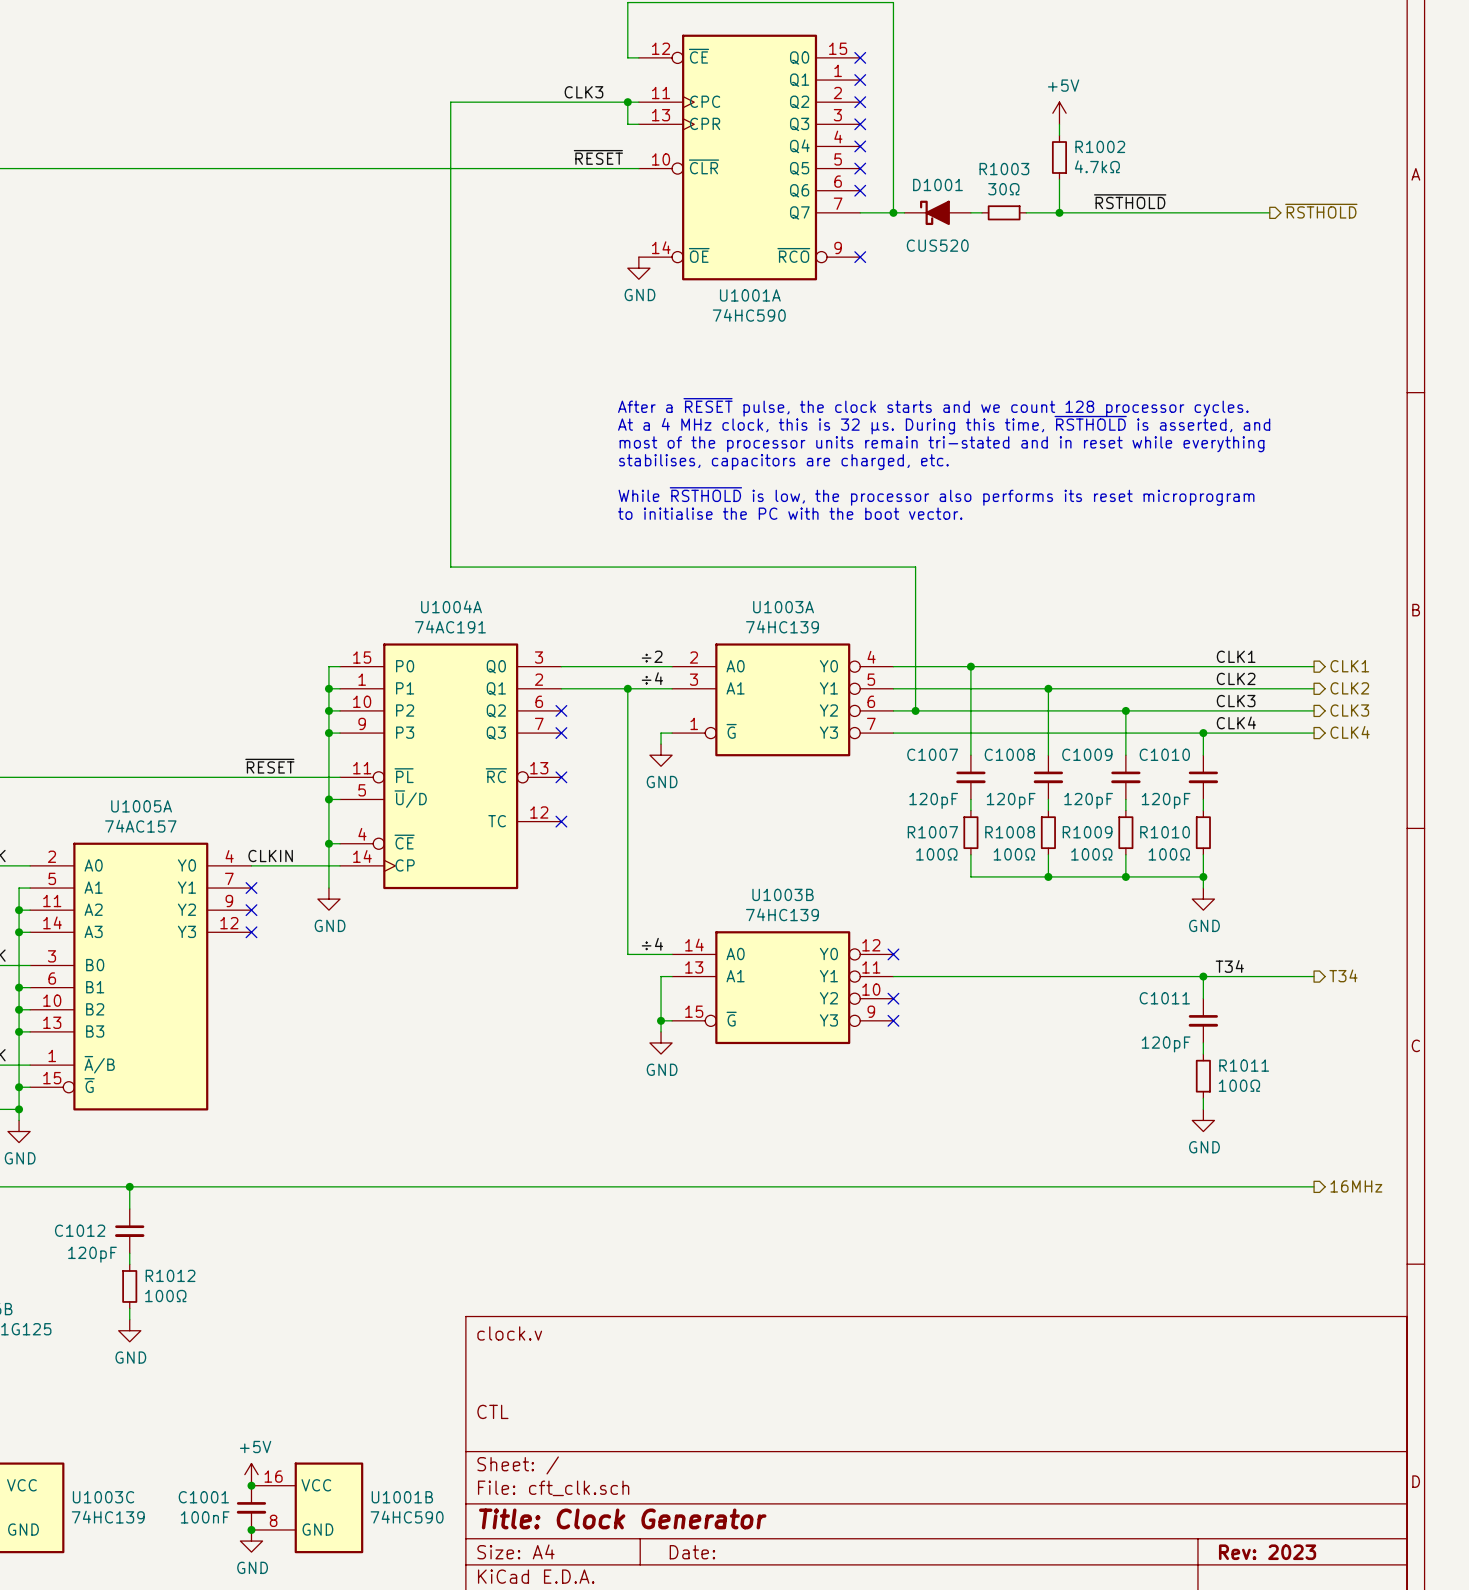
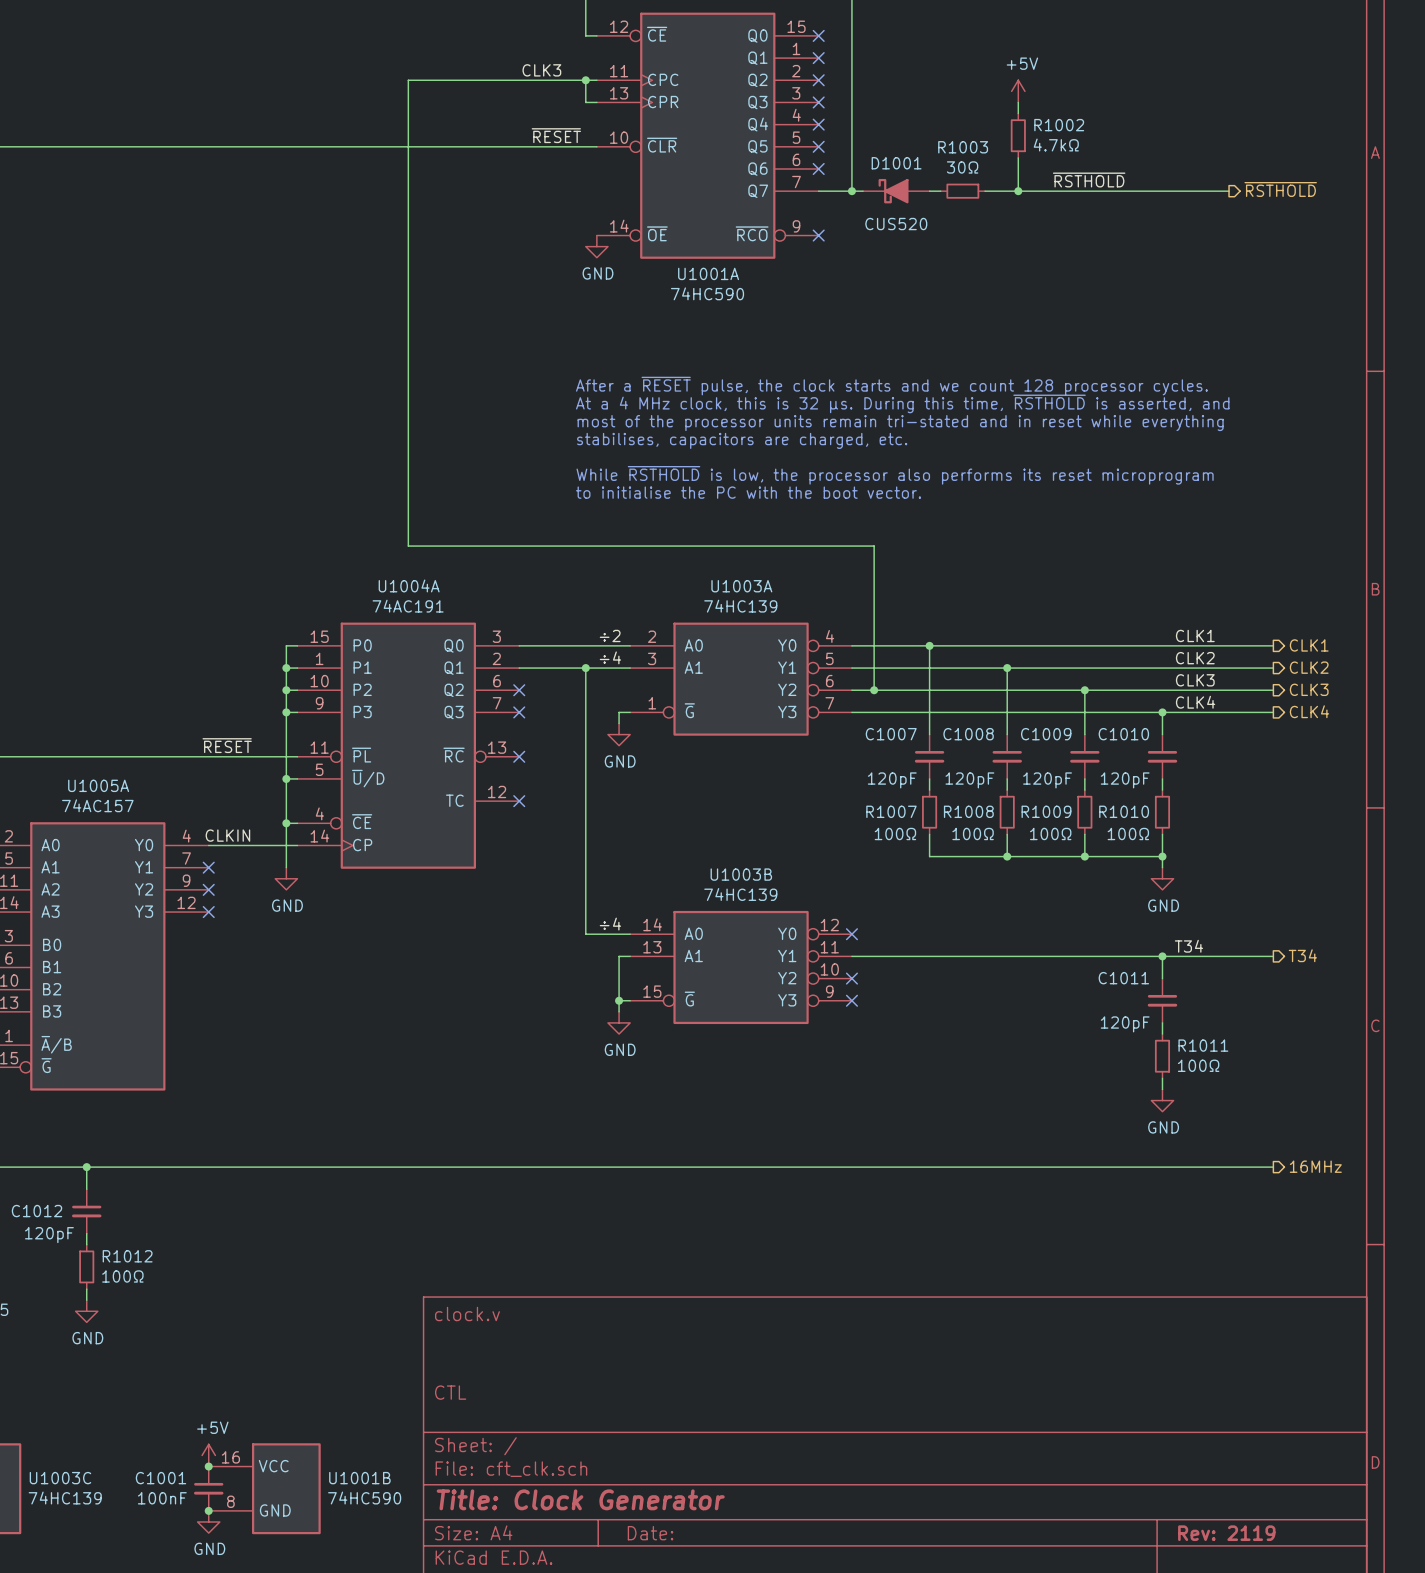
title block: Rev: 2023 (1267, 1552) -> Rev: 2119 (1226, 1533)

